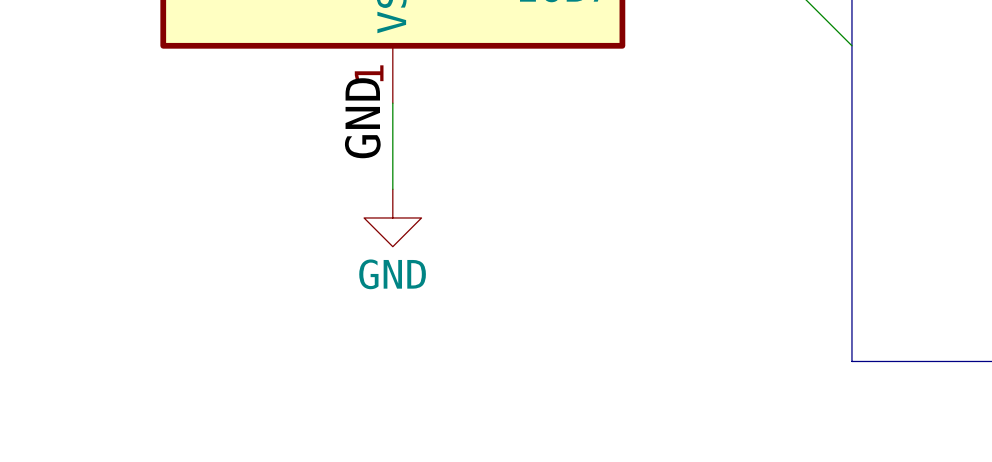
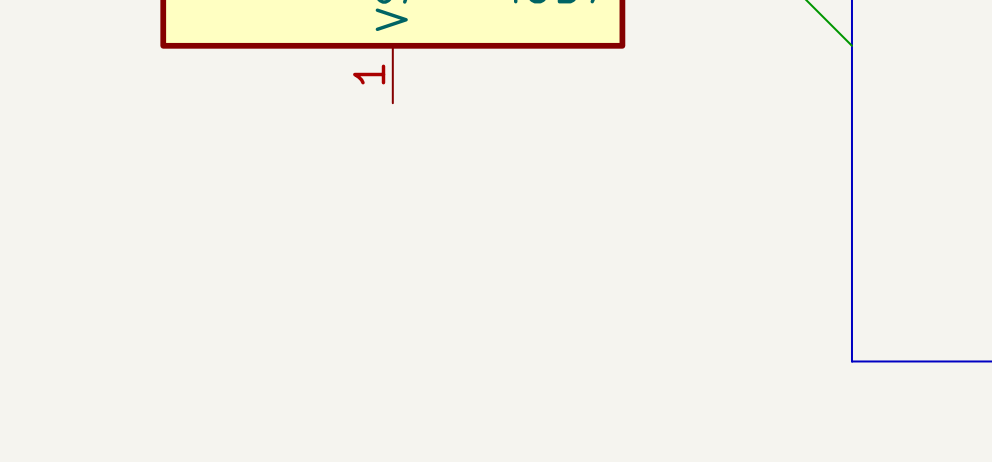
wire: (392, 103) (392, 189) -> none
label: GND (362, 118) -> none
power symbol: GND (392, 217) -> none

